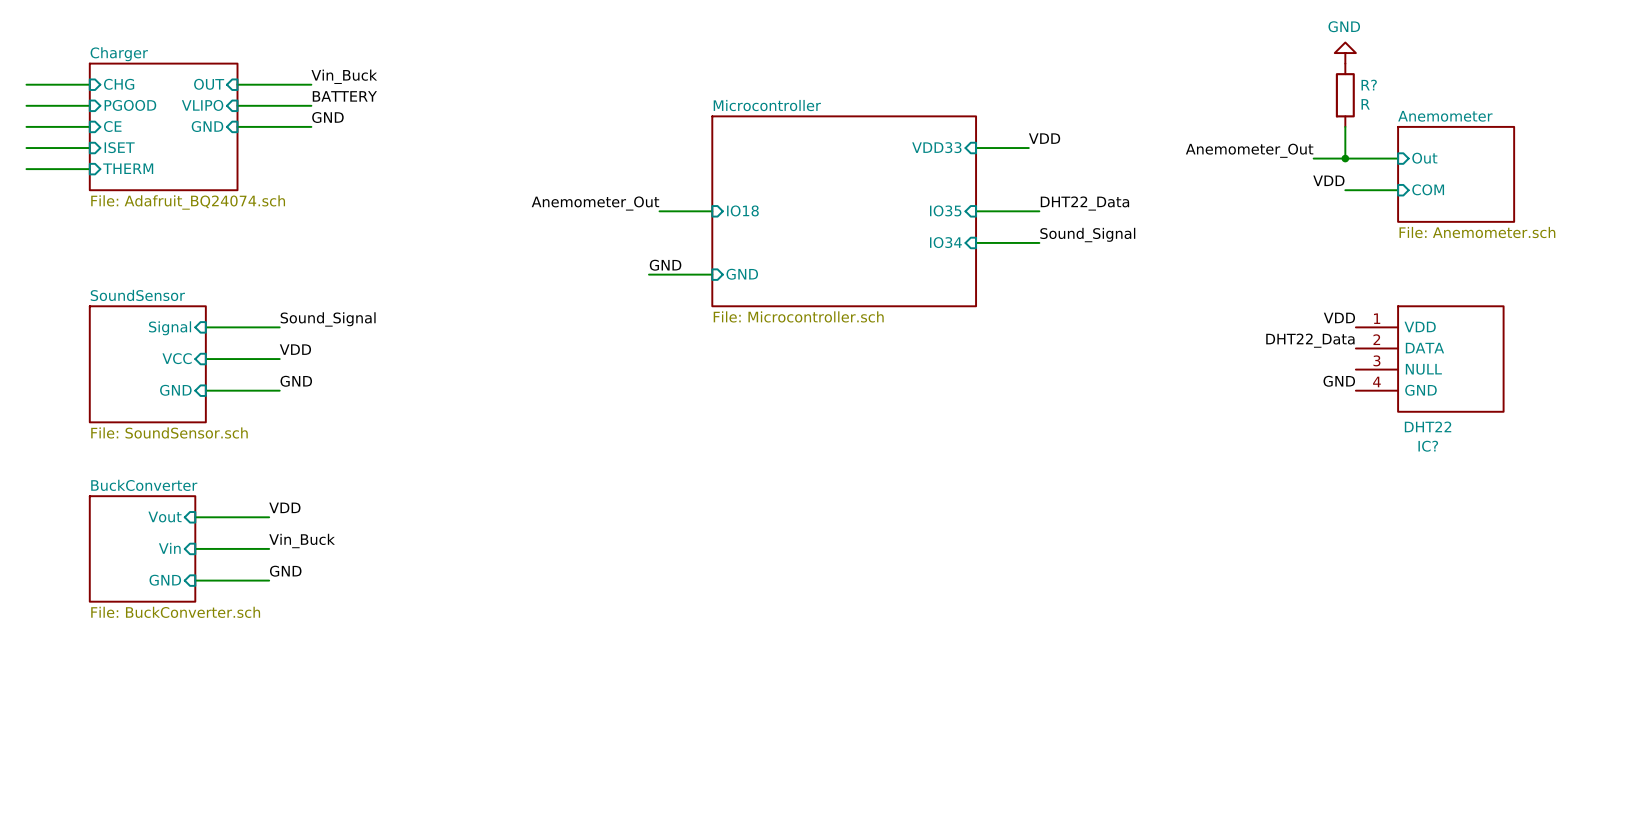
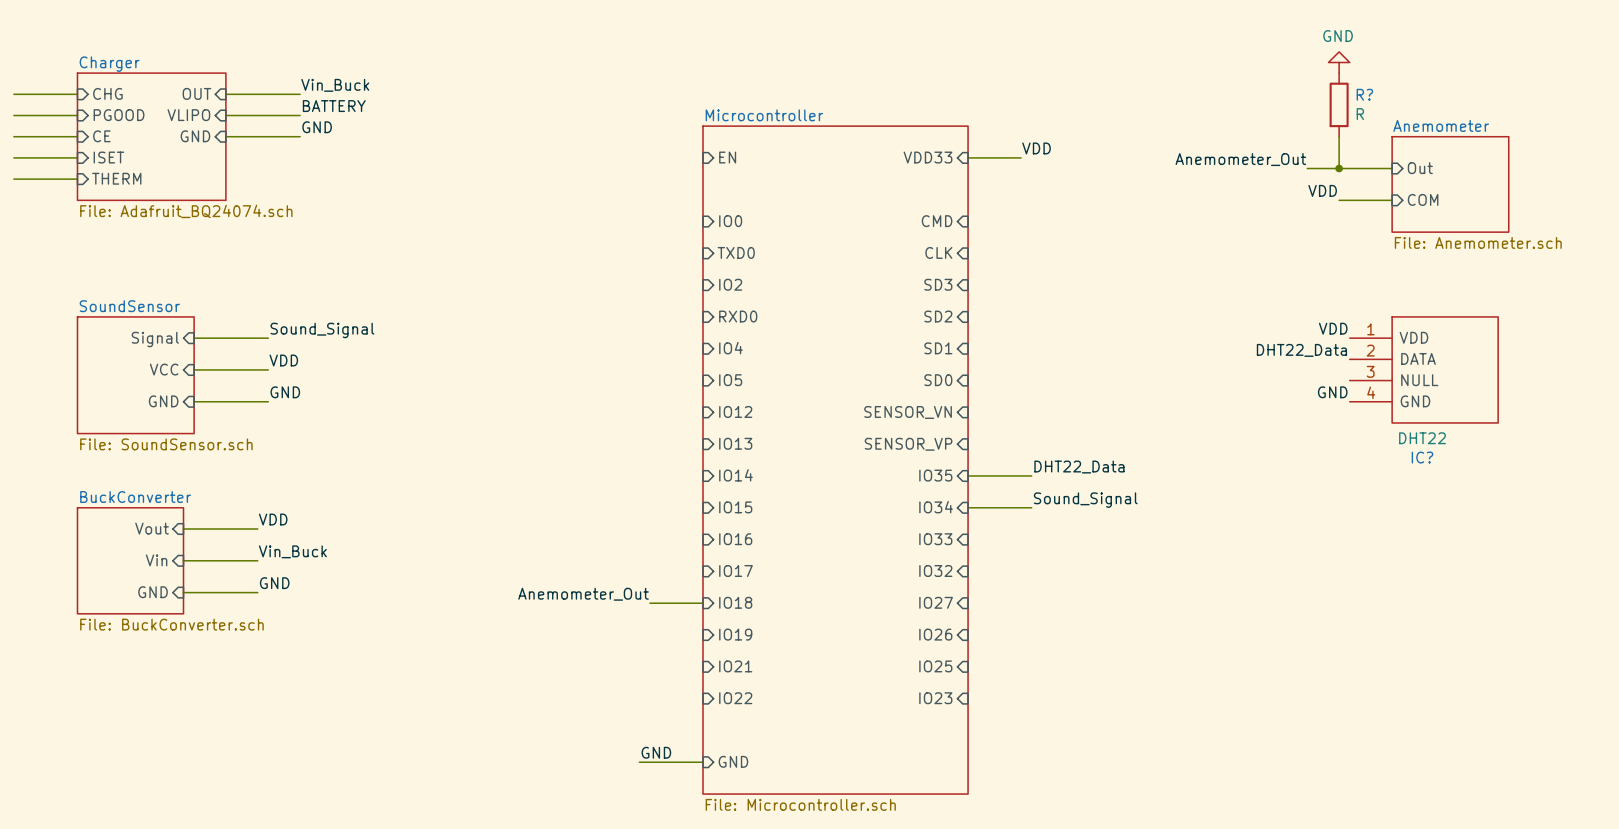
sheet pin: none -> EN (727, 157)
label: Anemometer_Out (595, 203) -> none
label: DHT22_Data (1084, 203) -> none
sheet pin: IO18 (742, 210) -> IO0 (730, 221)
sheet pin: IO35 (945, 210) -> CMD (937, 221)
wire: (659, 211) (712, 211) -> none
sheet Microcontroller: File: Microcontroller.sch (844, 211) -> none
wire: (976, 211) (1039, 211) -> none
label: Sound_Signal (1087, 235) -> none
sheet pin: none -> TXD0 (736, 252)
sheet pin: IO34 (945, 242) -> CLK (938, 252)
wire: (976, 242) (1039, 242) -> none
label: GND (665, 265) -> none
wire: (648, 274) (712, 274) -> none
sheet pin: GND (742, 274) -> IO2 (730, 284)
sheet pin: none -> SD3 (938, 284)
sheet pin: none -> RXD0 (738, 316)
sheet pin: none -> SD2 (938, 316)
sheet pin: none -> IO4 (730, 348)
sheet pin: none -> SD1 (938, 348)
sheet pin: none -> IO5 (730, 380)
sheet pin: none -> SD0 (938, 380)
sheet pin: none -> IO12 (735, 411)
sheet pin: none -> SENSOR_VN (908, 412)
sheet pin: none -> IO13 (735, 443)
sheet pin: none -> SENSOR_VP (908, 444)
sheet Microcontroller: none -> File: Microcontroller.sch (835, 460)
label: none -> DHT22_Data (1079, 467)
sheet pin: none -> IO14 (735, 475)
sheet pin: none -> IO35 (935, 475)
wire: none -> (968, 475) (1031, 475)
label: none -> Sound_Signal (1085, 500)
sheet pin: none -> IO15 (735, 507)
sheet pin: none -> IO34 (936, 507)
wire: none -> (968, 507) (1031, 507)
sheet pin: none -> IO16 (735, 539)
sheet pin: none -> IO33 (935, 539)
sheet pin: none -> IO17 (735, 571)
sheet pin: none -> IO32 (935, 571)
label: none -> Anemometer_Out (583, 594)
sheet pin: none -> IO18 (735, 602)
sheet pin: none -> IO27 (936, 602)
wire: none -> (649, 603) (702, 603)
sheet pin: none -> IO19 (735, 634)
sheet pin: none -> IO26 (935, 634)
sheet pin: none -> IO21 (735, 666)
sheet pin: none -> IO25 (935, 666)
sheet pin: none -> IO22 (735, 698)
sheet pin: none -> IO23 (935, 698)
label: none -> GND (656, 752)
wire: none -> (639, 762) (702, 762)
sheet pin: none -> GND (733, 761)

